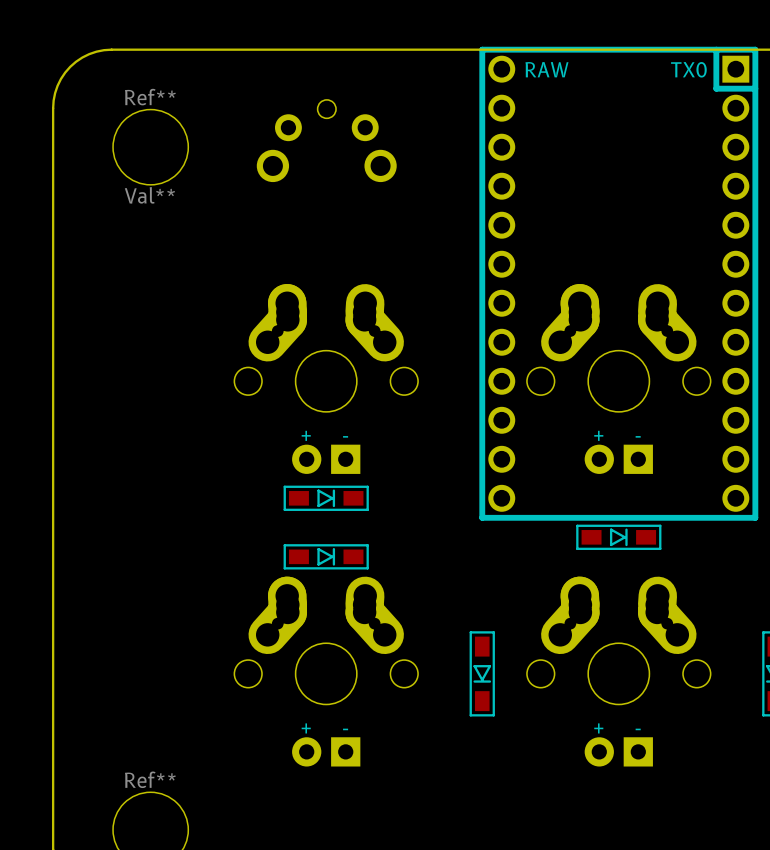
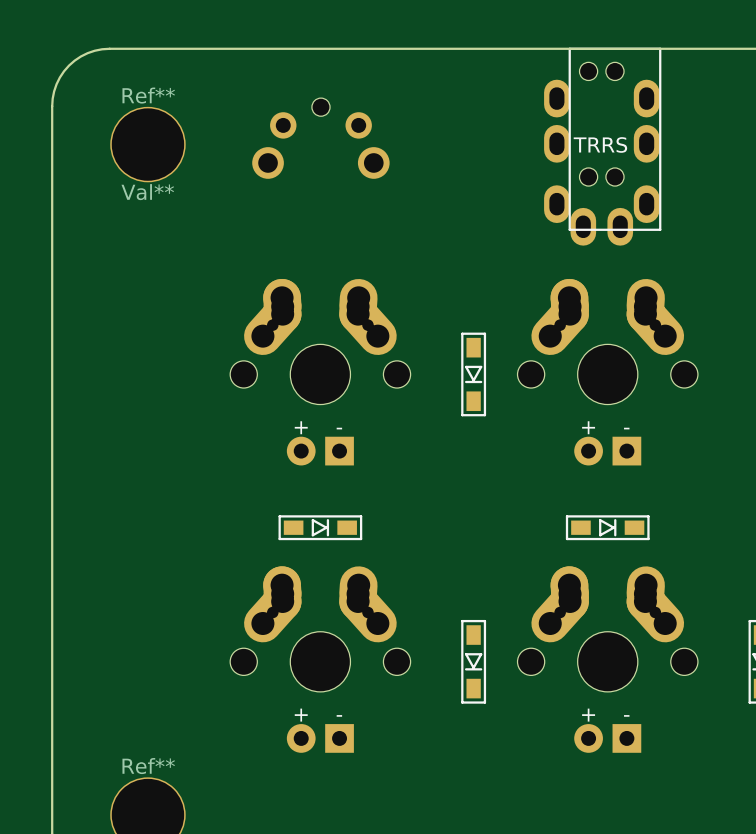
part: none -> (602, 146)
part: (618, 283) -> none
part: none -> (473, 374)
part: (326, 498) -> none
part: none -> (320, 527)
part: (326, 556) -> none

